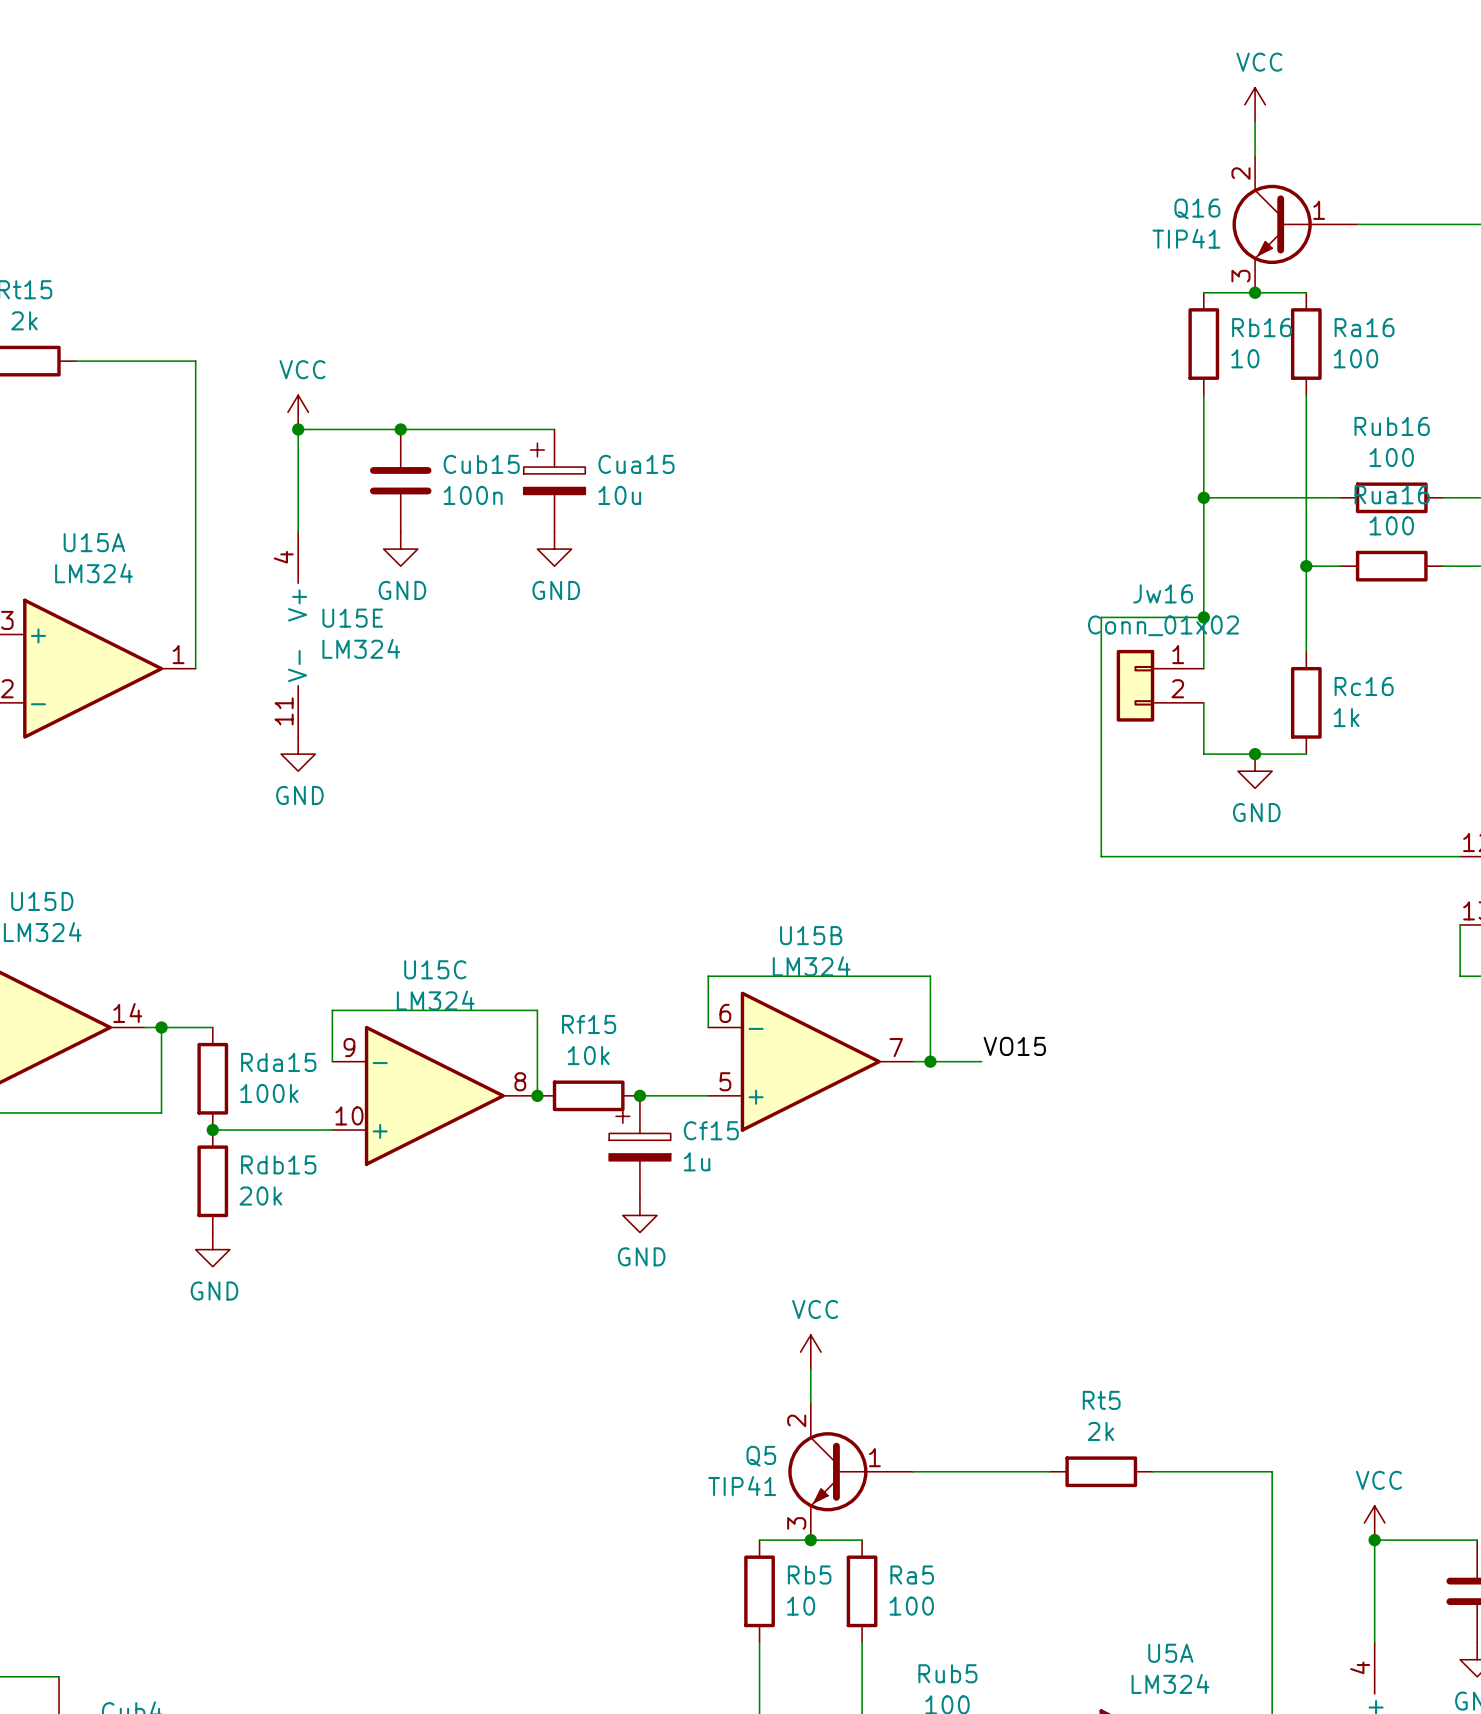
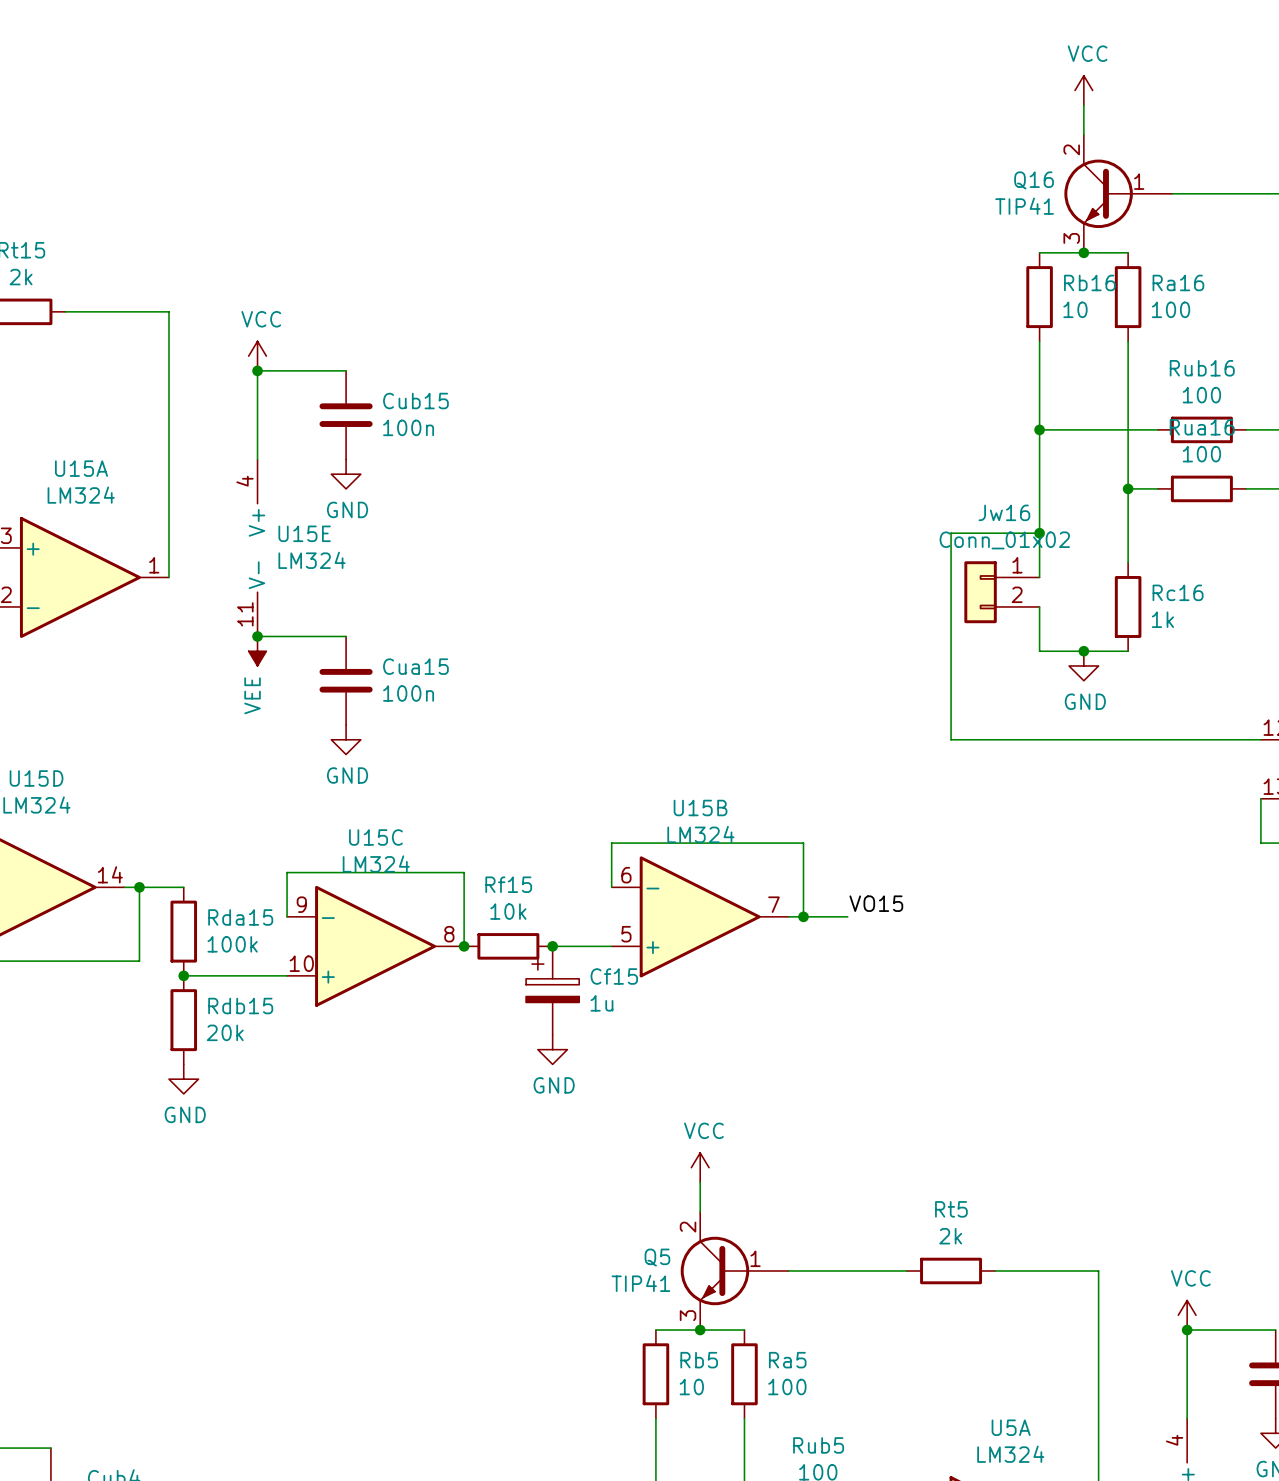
wire: (400, 429) (554, 429) -> none
junction: (400, 429) -> none
Cua15 symbol: [523, 429, 586, 532] -> [319, 636, 373, 726]
Cua15 value: 10u (619, 495) -> 100n (408, 693)
power symbol: GND (554, 549) -> none
wire: none -> (257, 636) (346, 636)
junction: none -> (257, 636)
power symbol: GND (298, 754) -> VEE (257, 651)
power symbol: none -> GND (346, 739)

